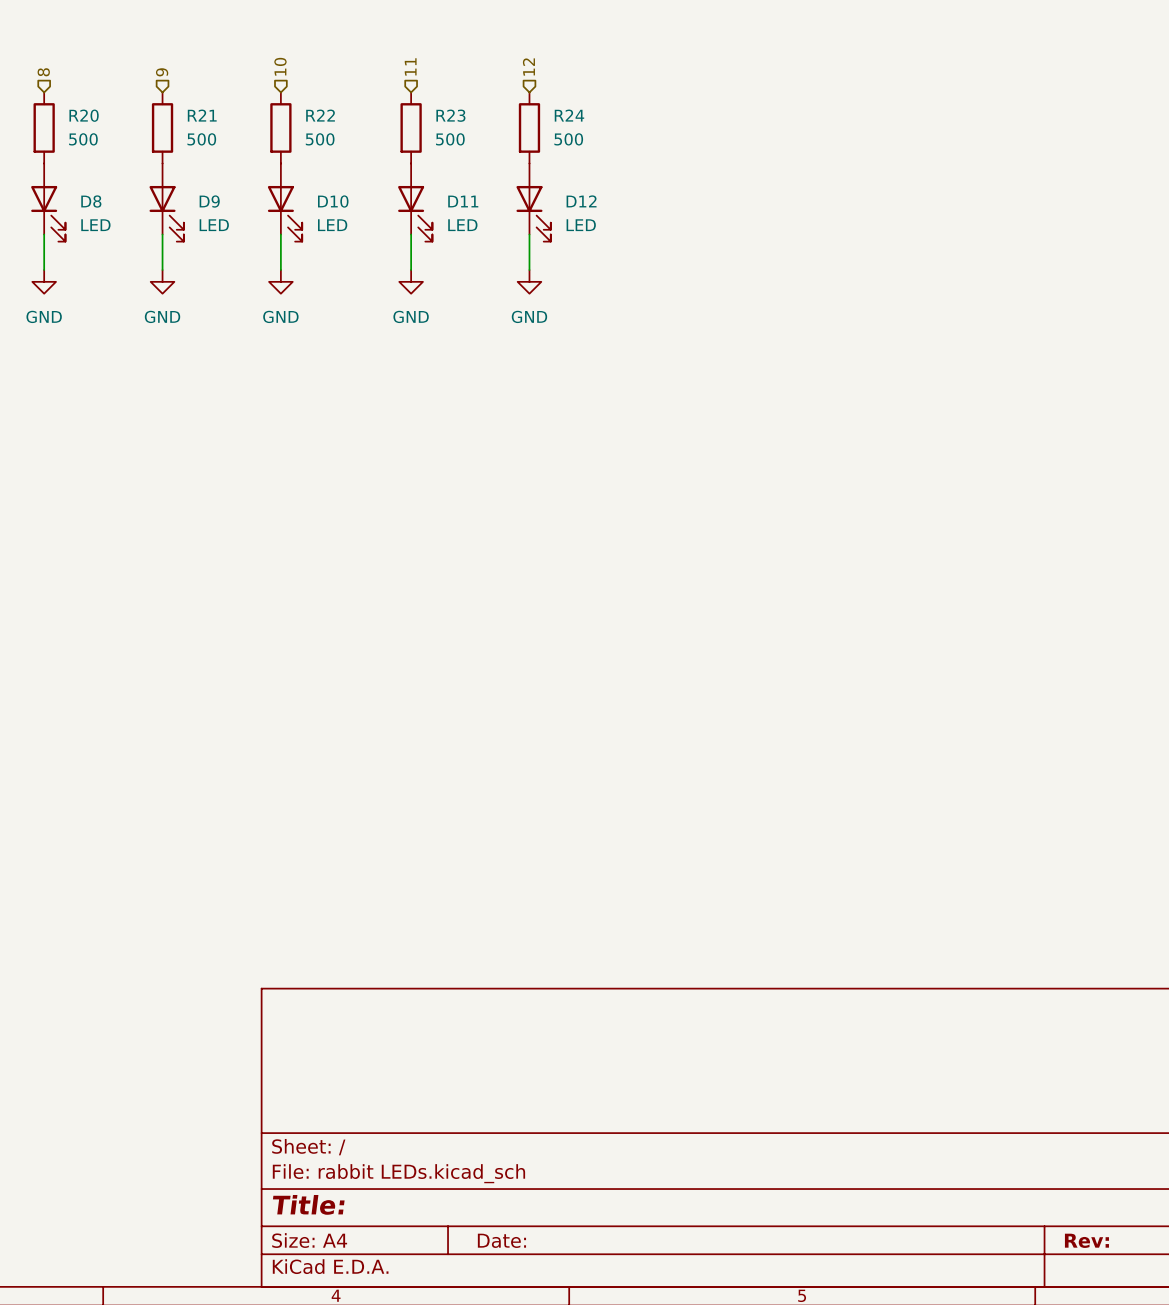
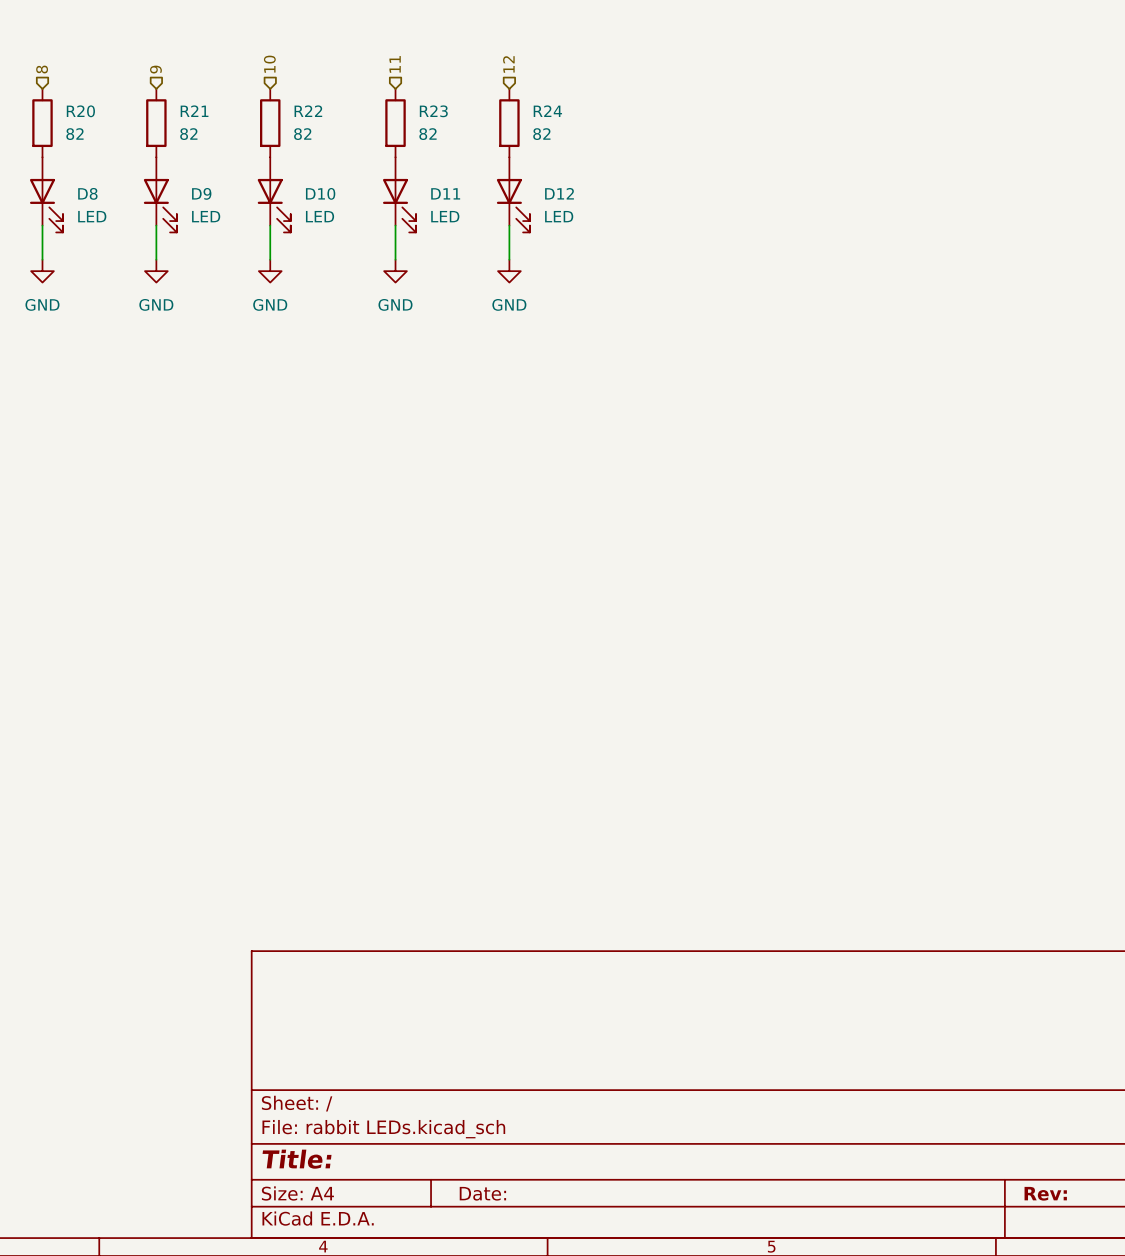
R20 value: 500 (83, 139) -> 82 (74, 134)
R21 value: 500 (201, 139) -> 82 (188, 134)
R22 value: 500 (320, 139) -> 82 (302, 134)
R23 value: 500 (450, 139) -> 82 (427, 134)
R24 value: 500 (568, 139) -> 82 (541, 134)

